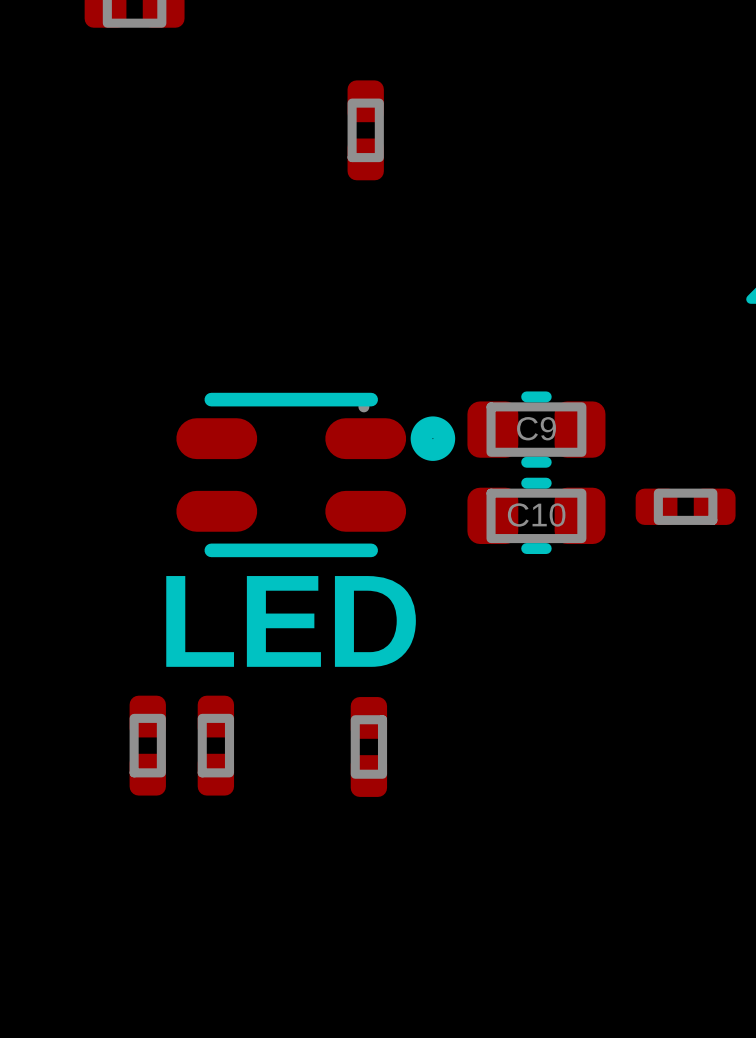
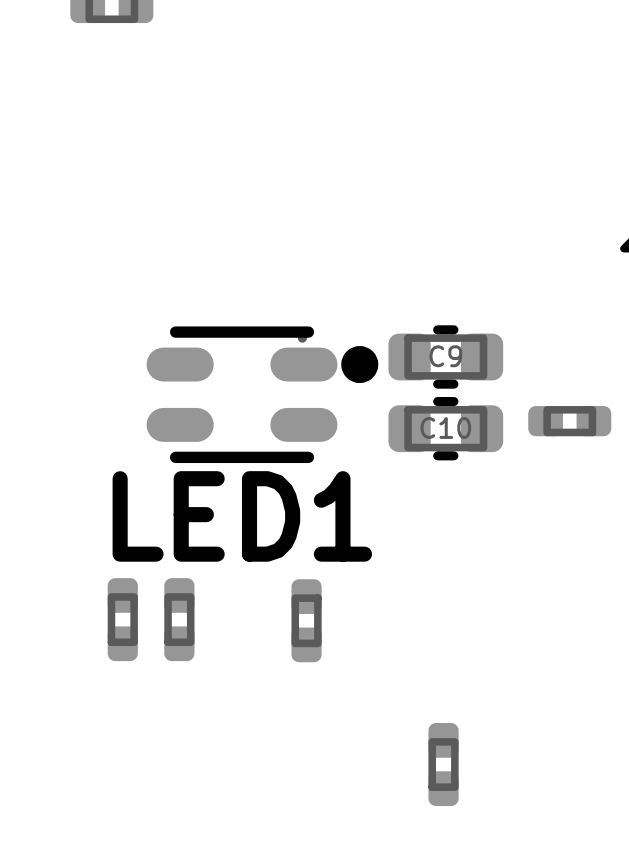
part position: (365, 130) -> (443, 764)
LED name: LED (291, 621) -> LED1 (242, 516)

